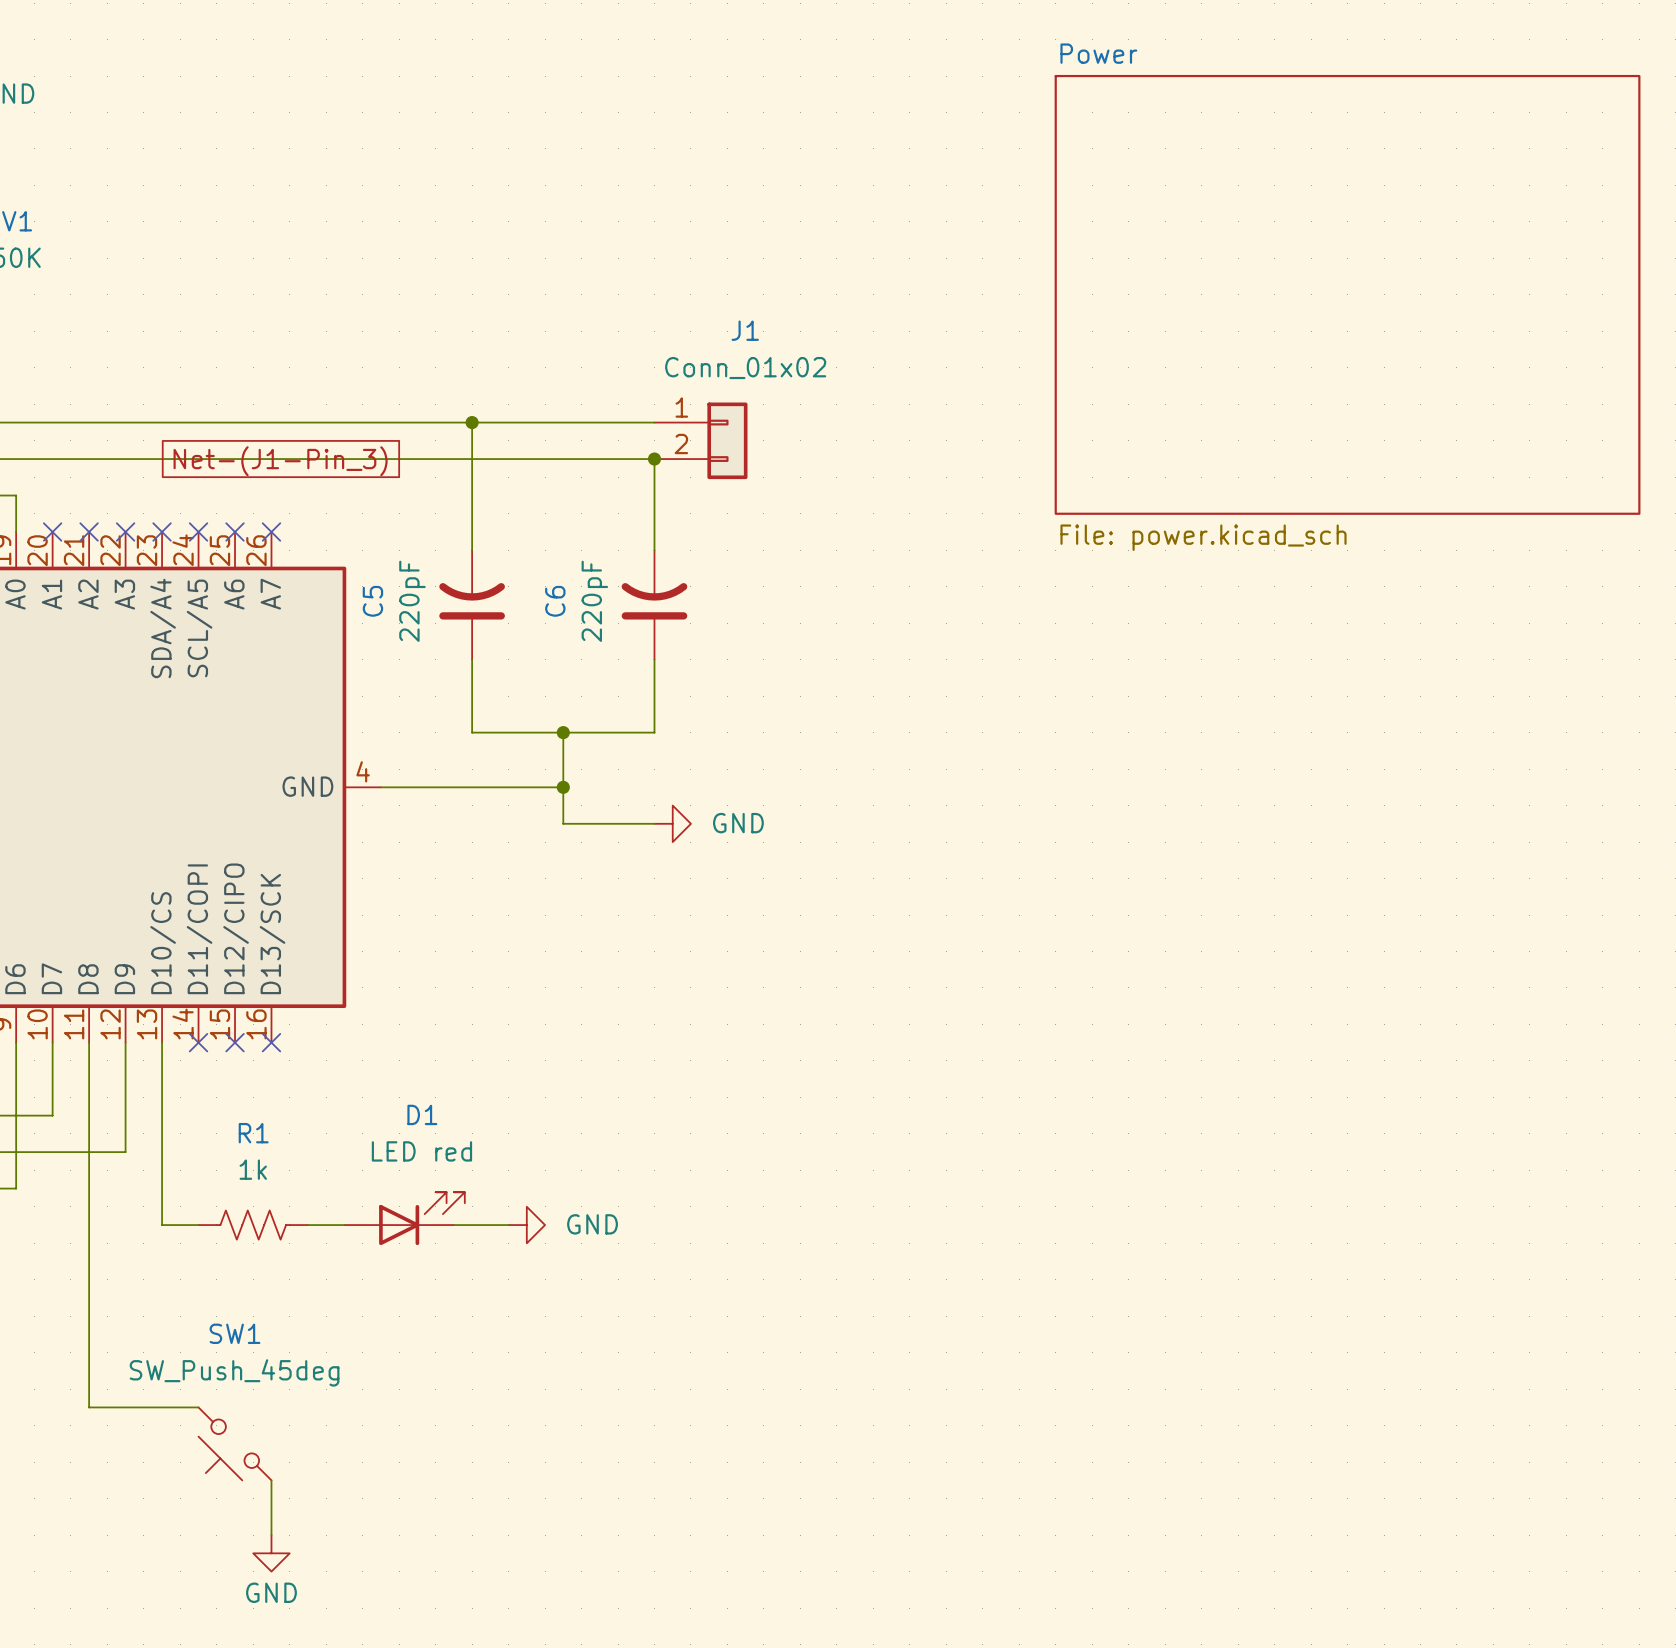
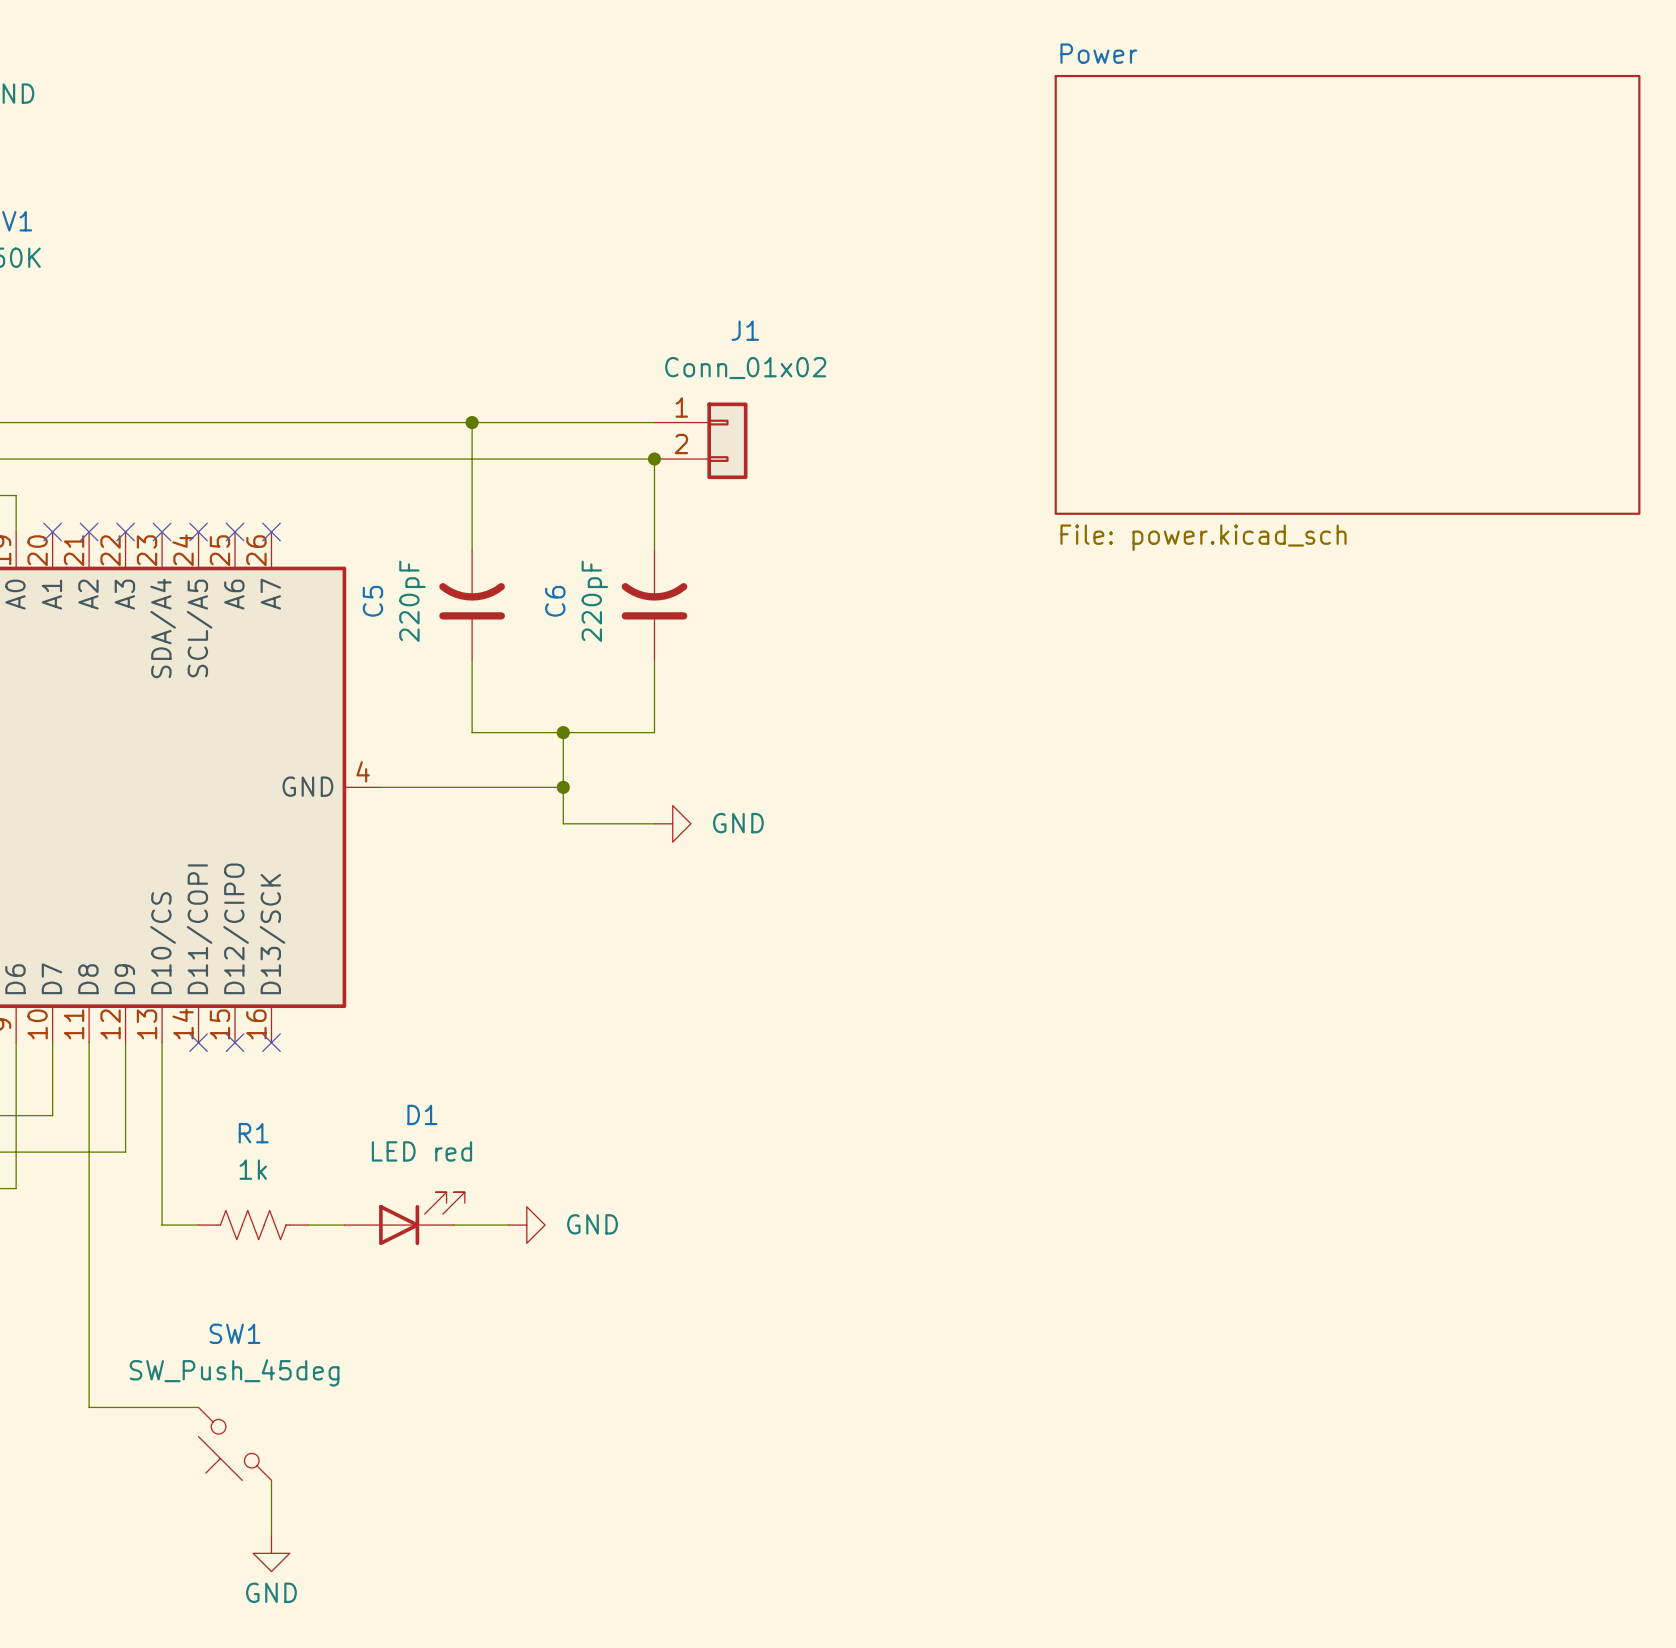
global label: Net-(J1-Pin_3) (280, 461) -> none

